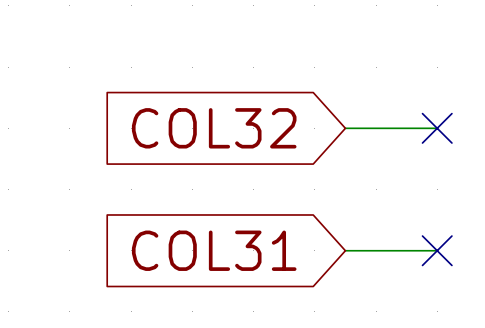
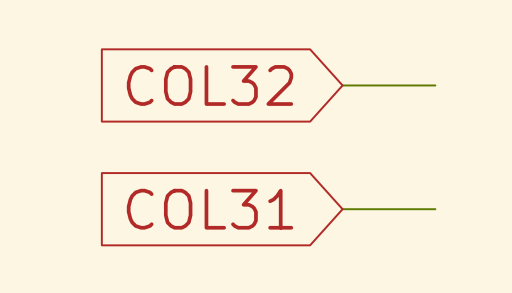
no-connect mark: (437, 128) -> none
no-connect mark: (437, 250) -> none

